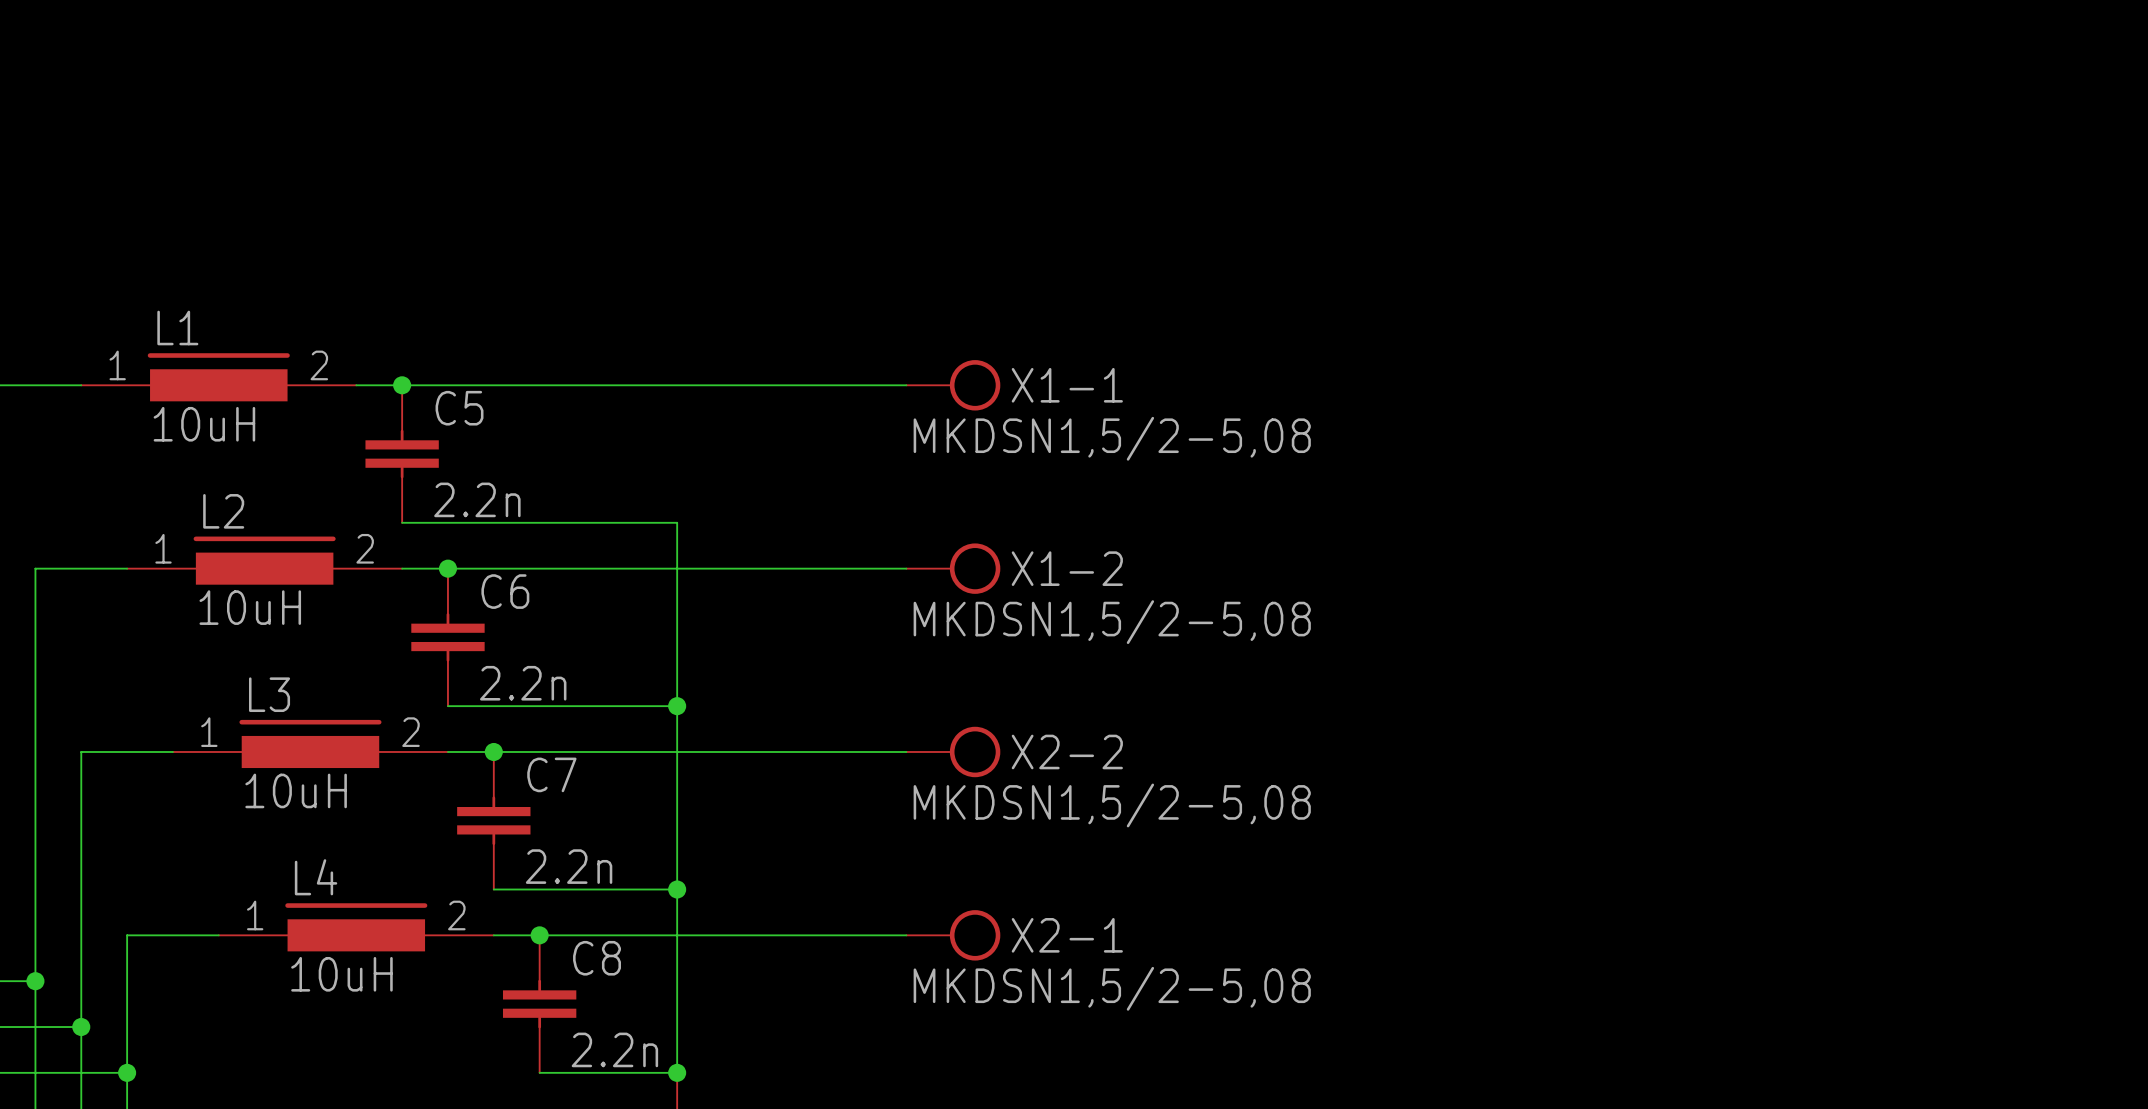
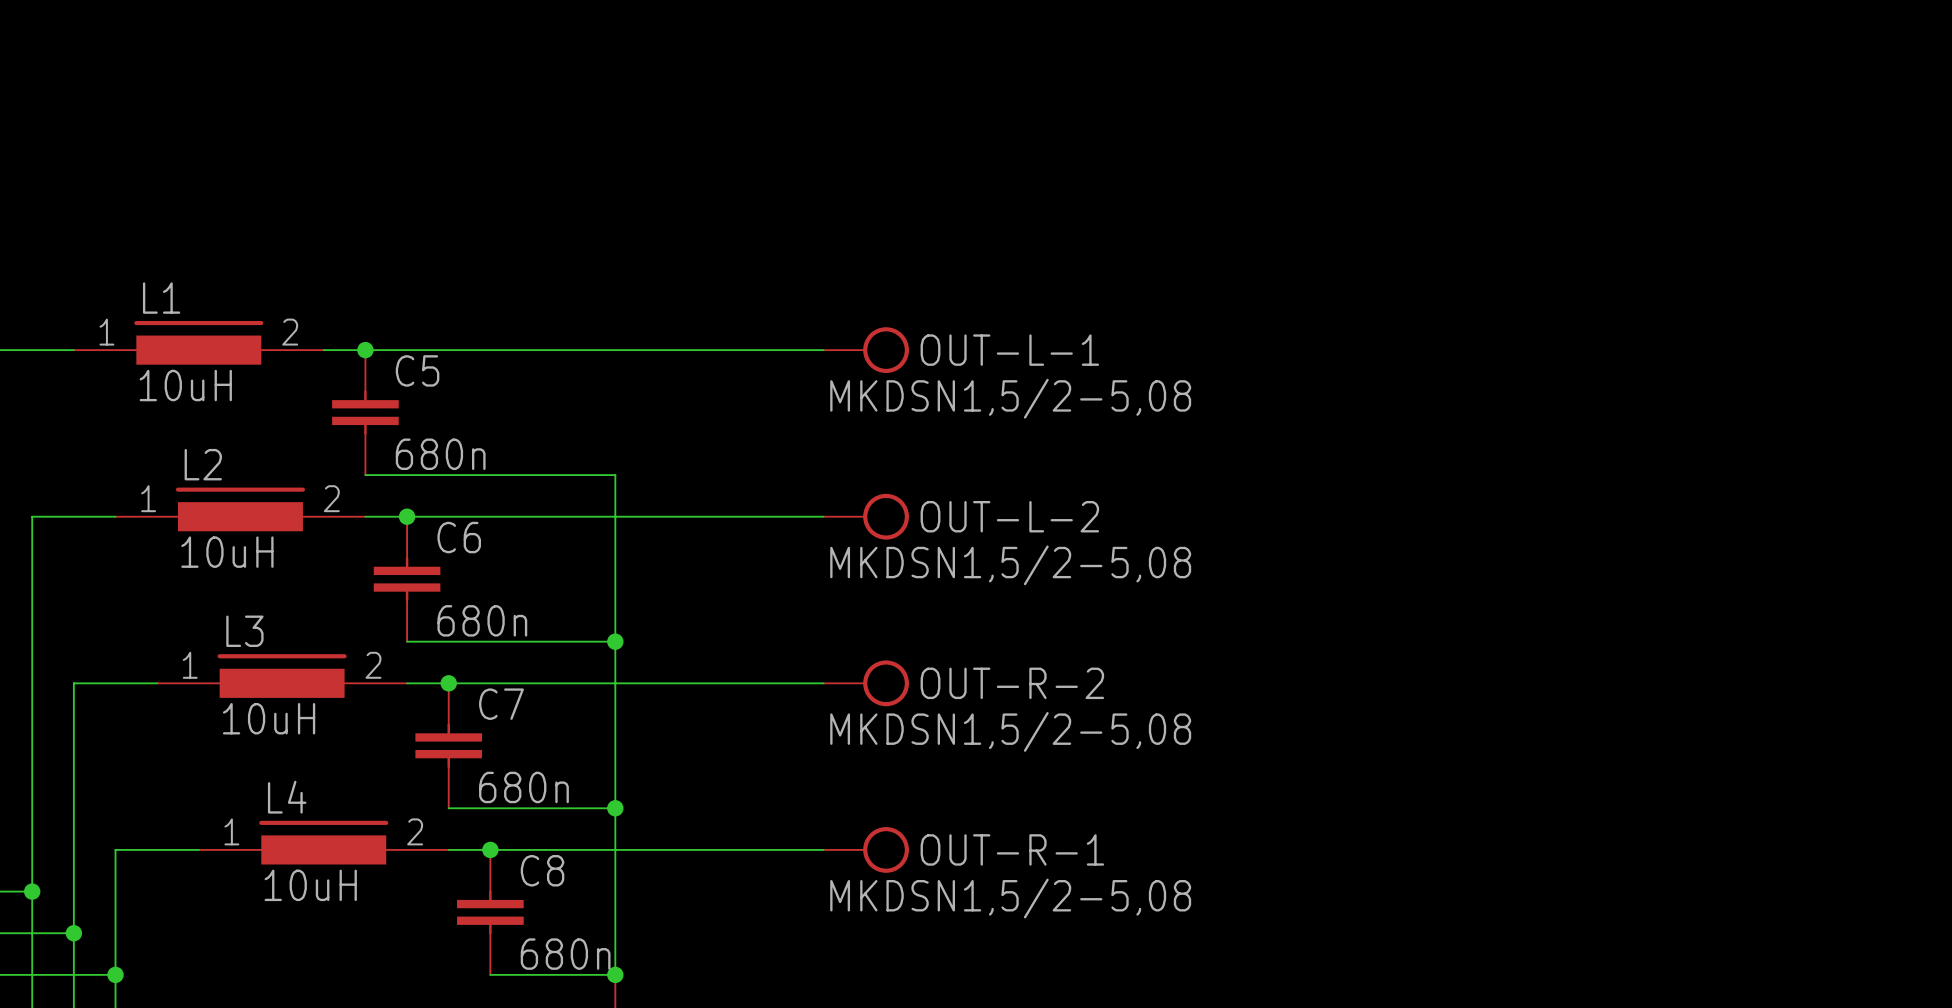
X1-1 name: X1-1 (1067, 385) -> OUT-L-1 (1009, 350)
C5 value: 2.2n (477, 499) -> 680n (440, 454)
X1-2 name: X1-2 (1067, 568) -> OUT-L-2 (1009, 516)
C6 value: 2.2n (523, 683) -> 680n (482, 620)
X2-2 name: X2-2 (1067, 751) -> OUT-R-2 (1012, 683)
C7 value: 2.2n (569, 866) -> 680n (523, 787)
X2-1 name: X2-1 (1067, 935) -> OUT-R-1 (1012, 849)
C8 value: 2.2n (614, 1049) -> 680n (565, 954)

